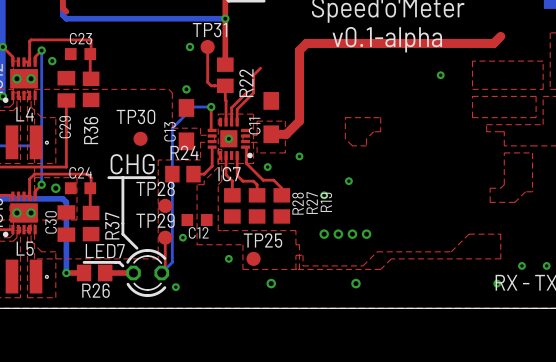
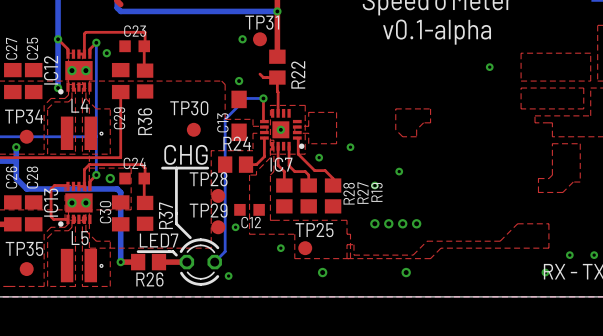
top track: (500, 36) (493, 43) (306, 43) (299, 50) (299, 121) (286, 134) (271, 134) -> none
top track: (207, 46) (207, 82) -> none
top track: (260, 68) (253, 75) (253, 92) (237, 109) (237, 122) -> none
top track: (246, 92) (231, 107) (231, 122) -> none
C11: (271, 117) -> none
top track: (165, 237) (165, 269) -> none

